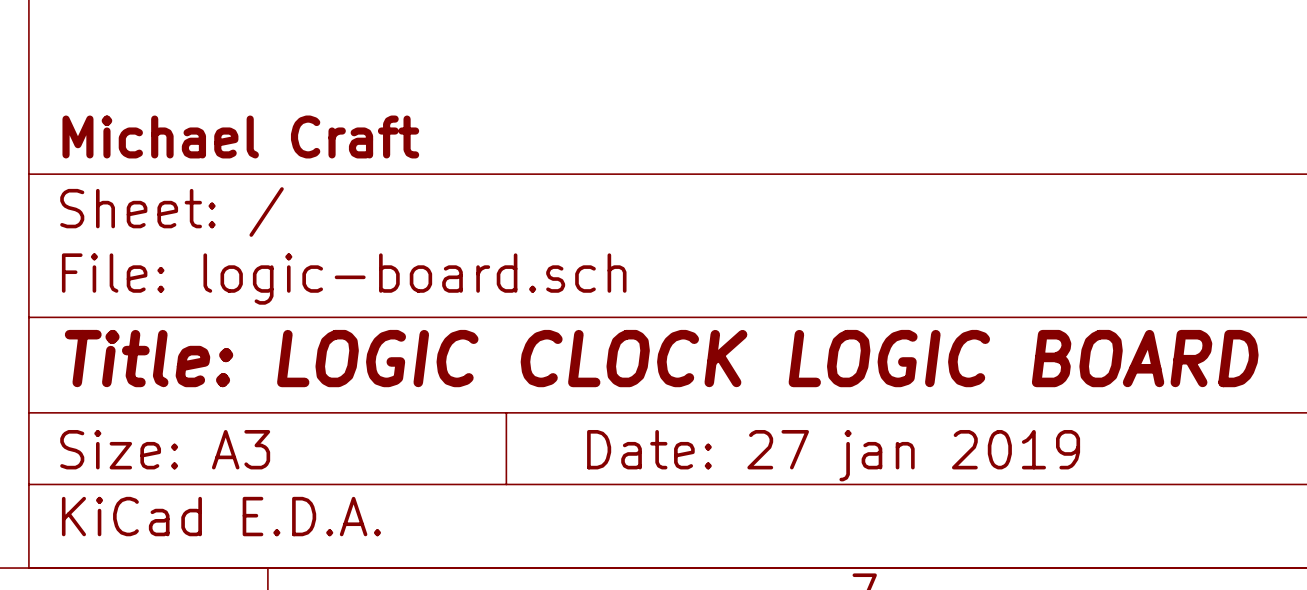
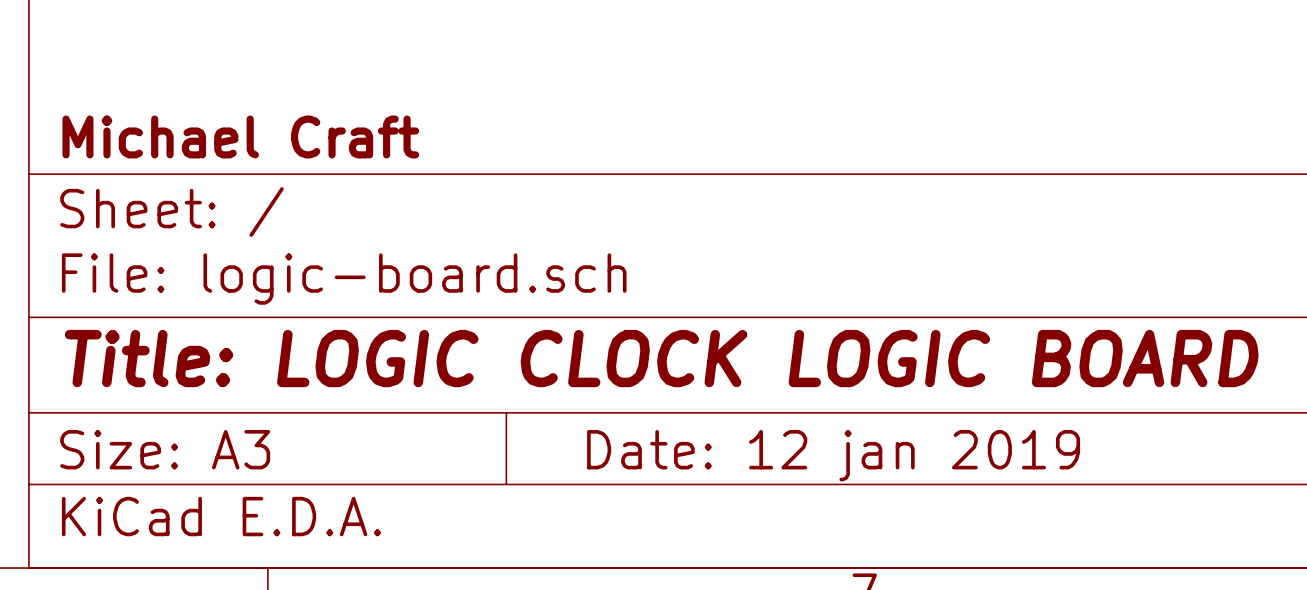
title block: Date: 27 jan 2019 (833, 455) -> Date: 12 jan 2019 (833, 455)

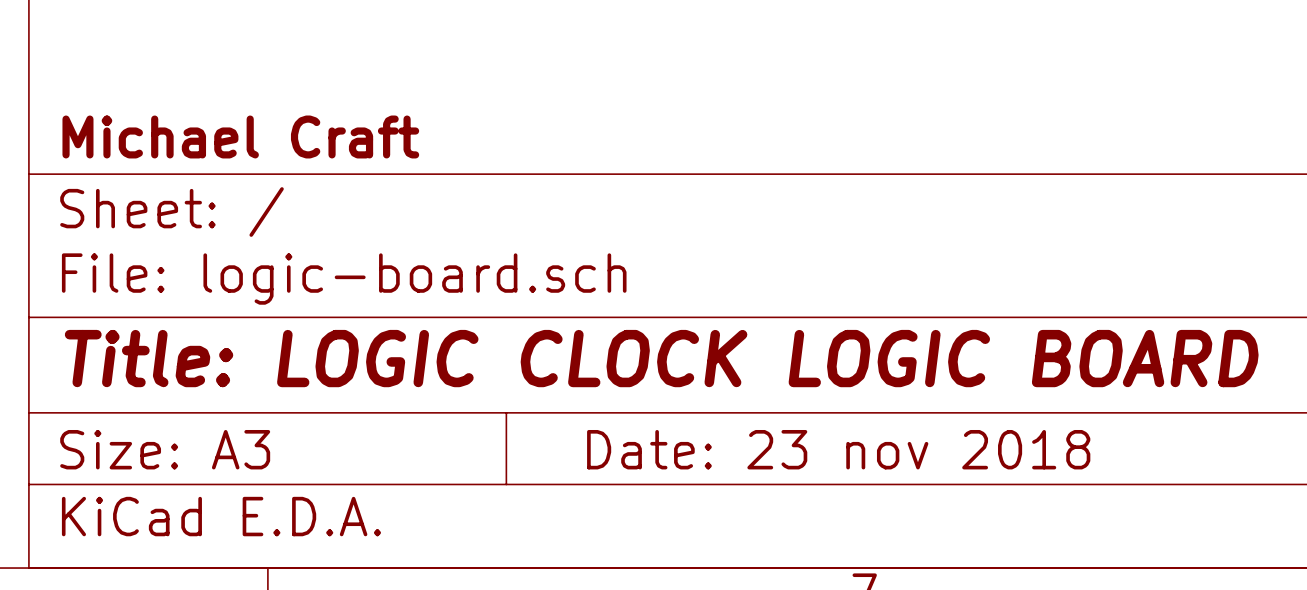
title block: Date: 12 jan 2019 (833, 455) -> Date: 23 nov 2018 (838, 449)

